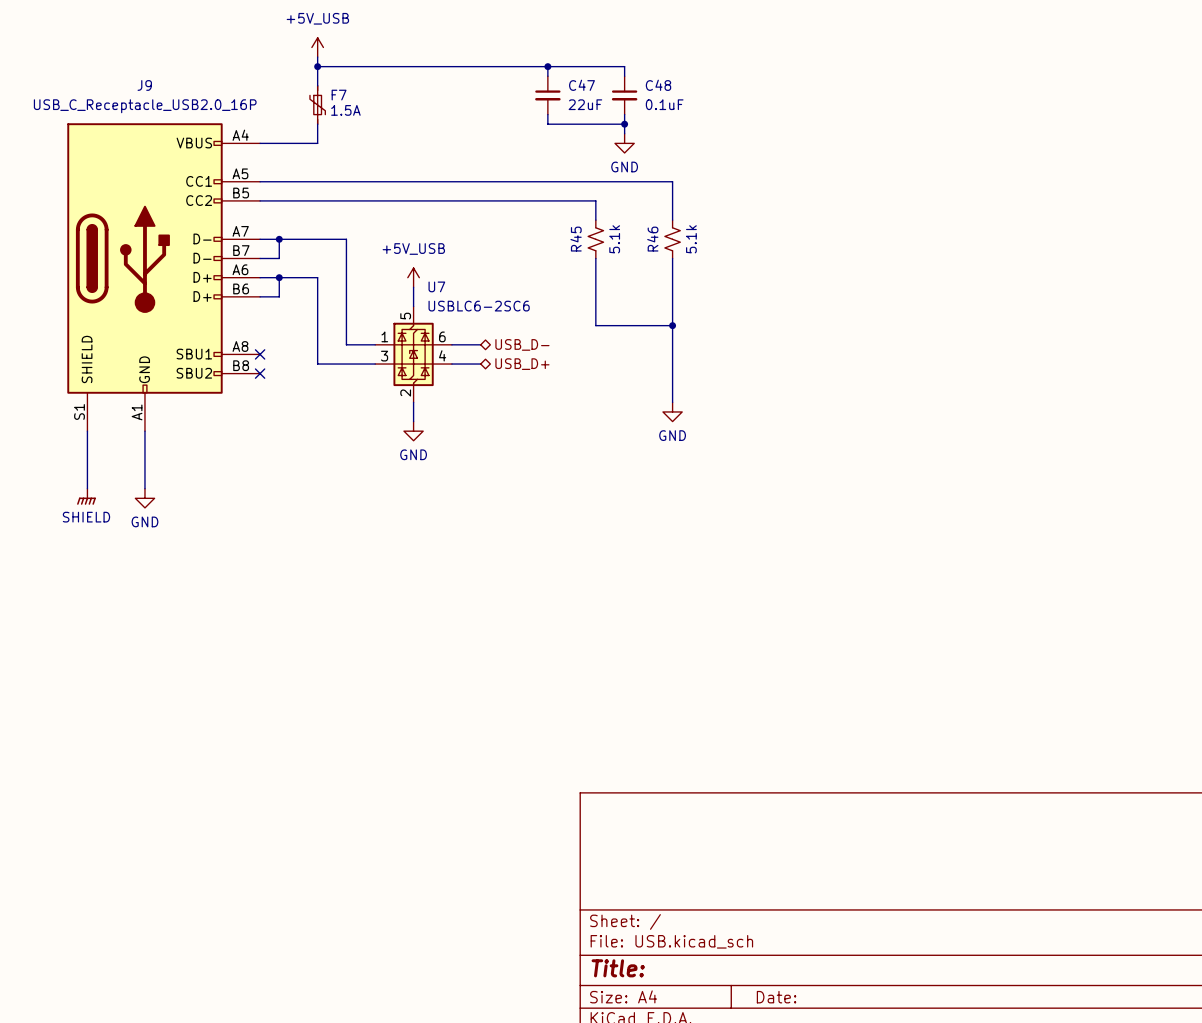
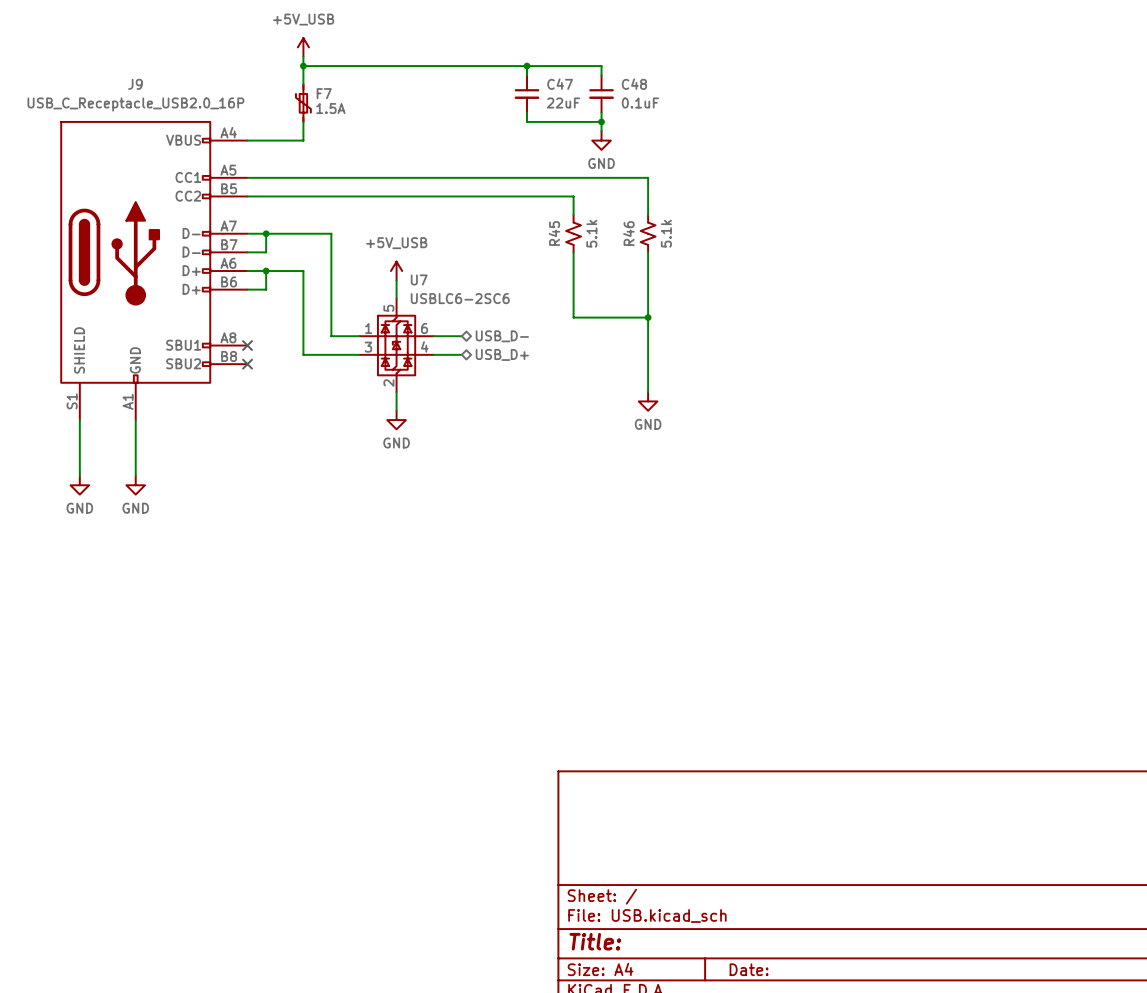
power symbol: SHIELD (86, 496) -> GND (79, 485)

